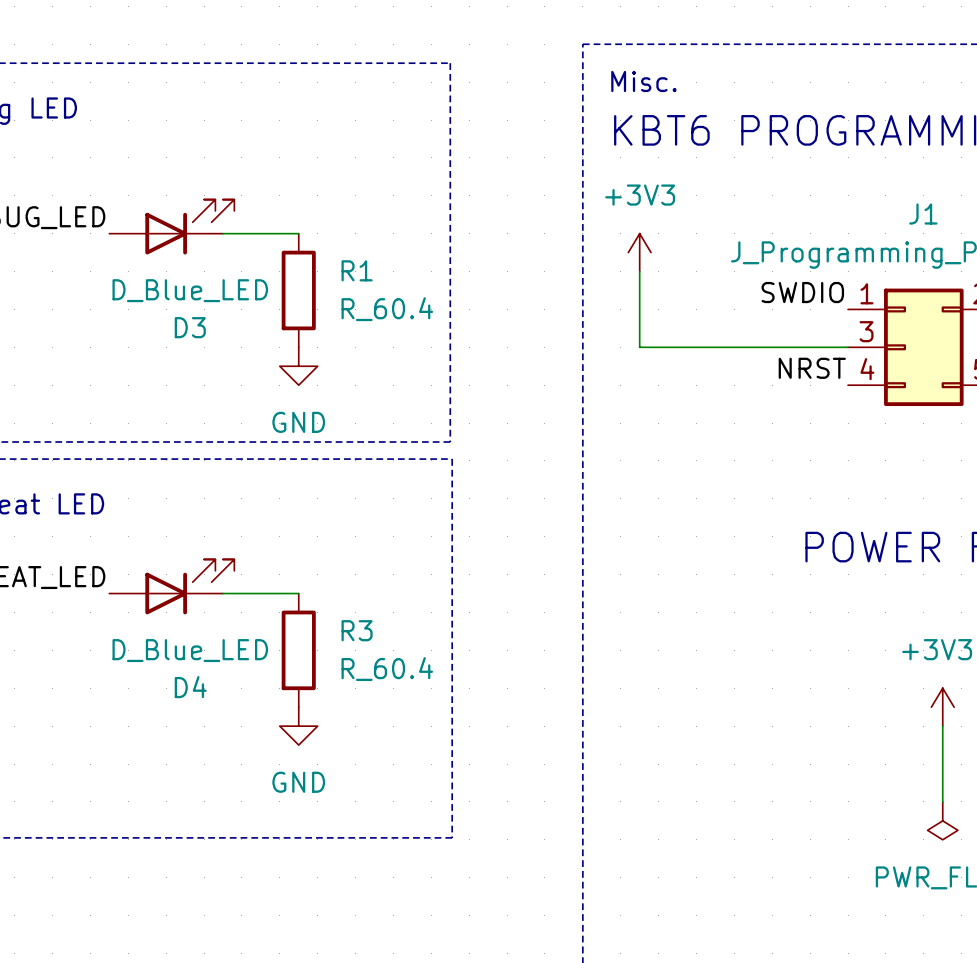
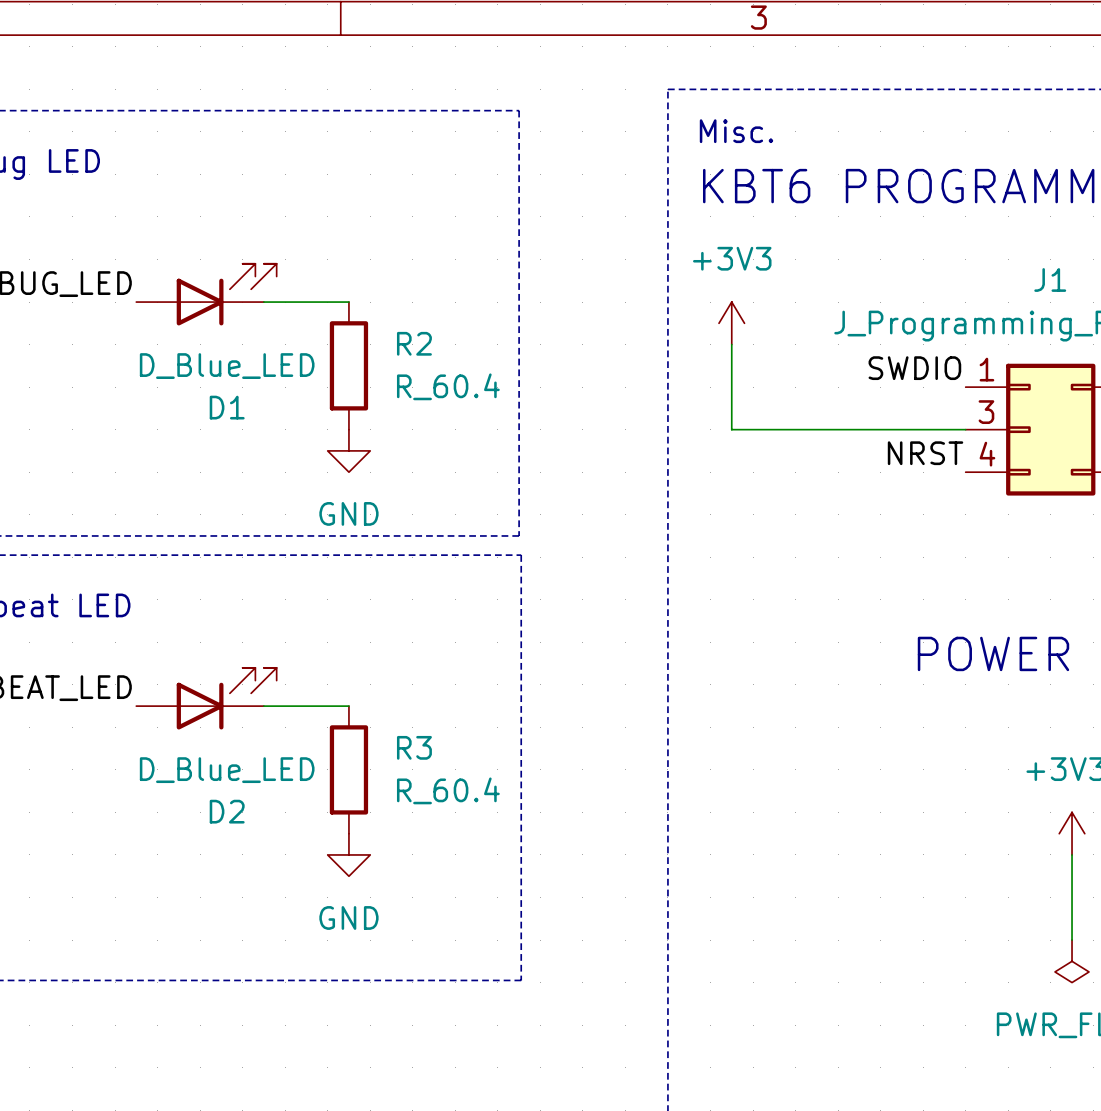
R1 name: R1 (357, 270) -> R2 (414, 343)
D3 name: D3 (190, 327) -> D1 (227, 407)
D4 name: D4 (190, 687) -> D2 (227, 811)

